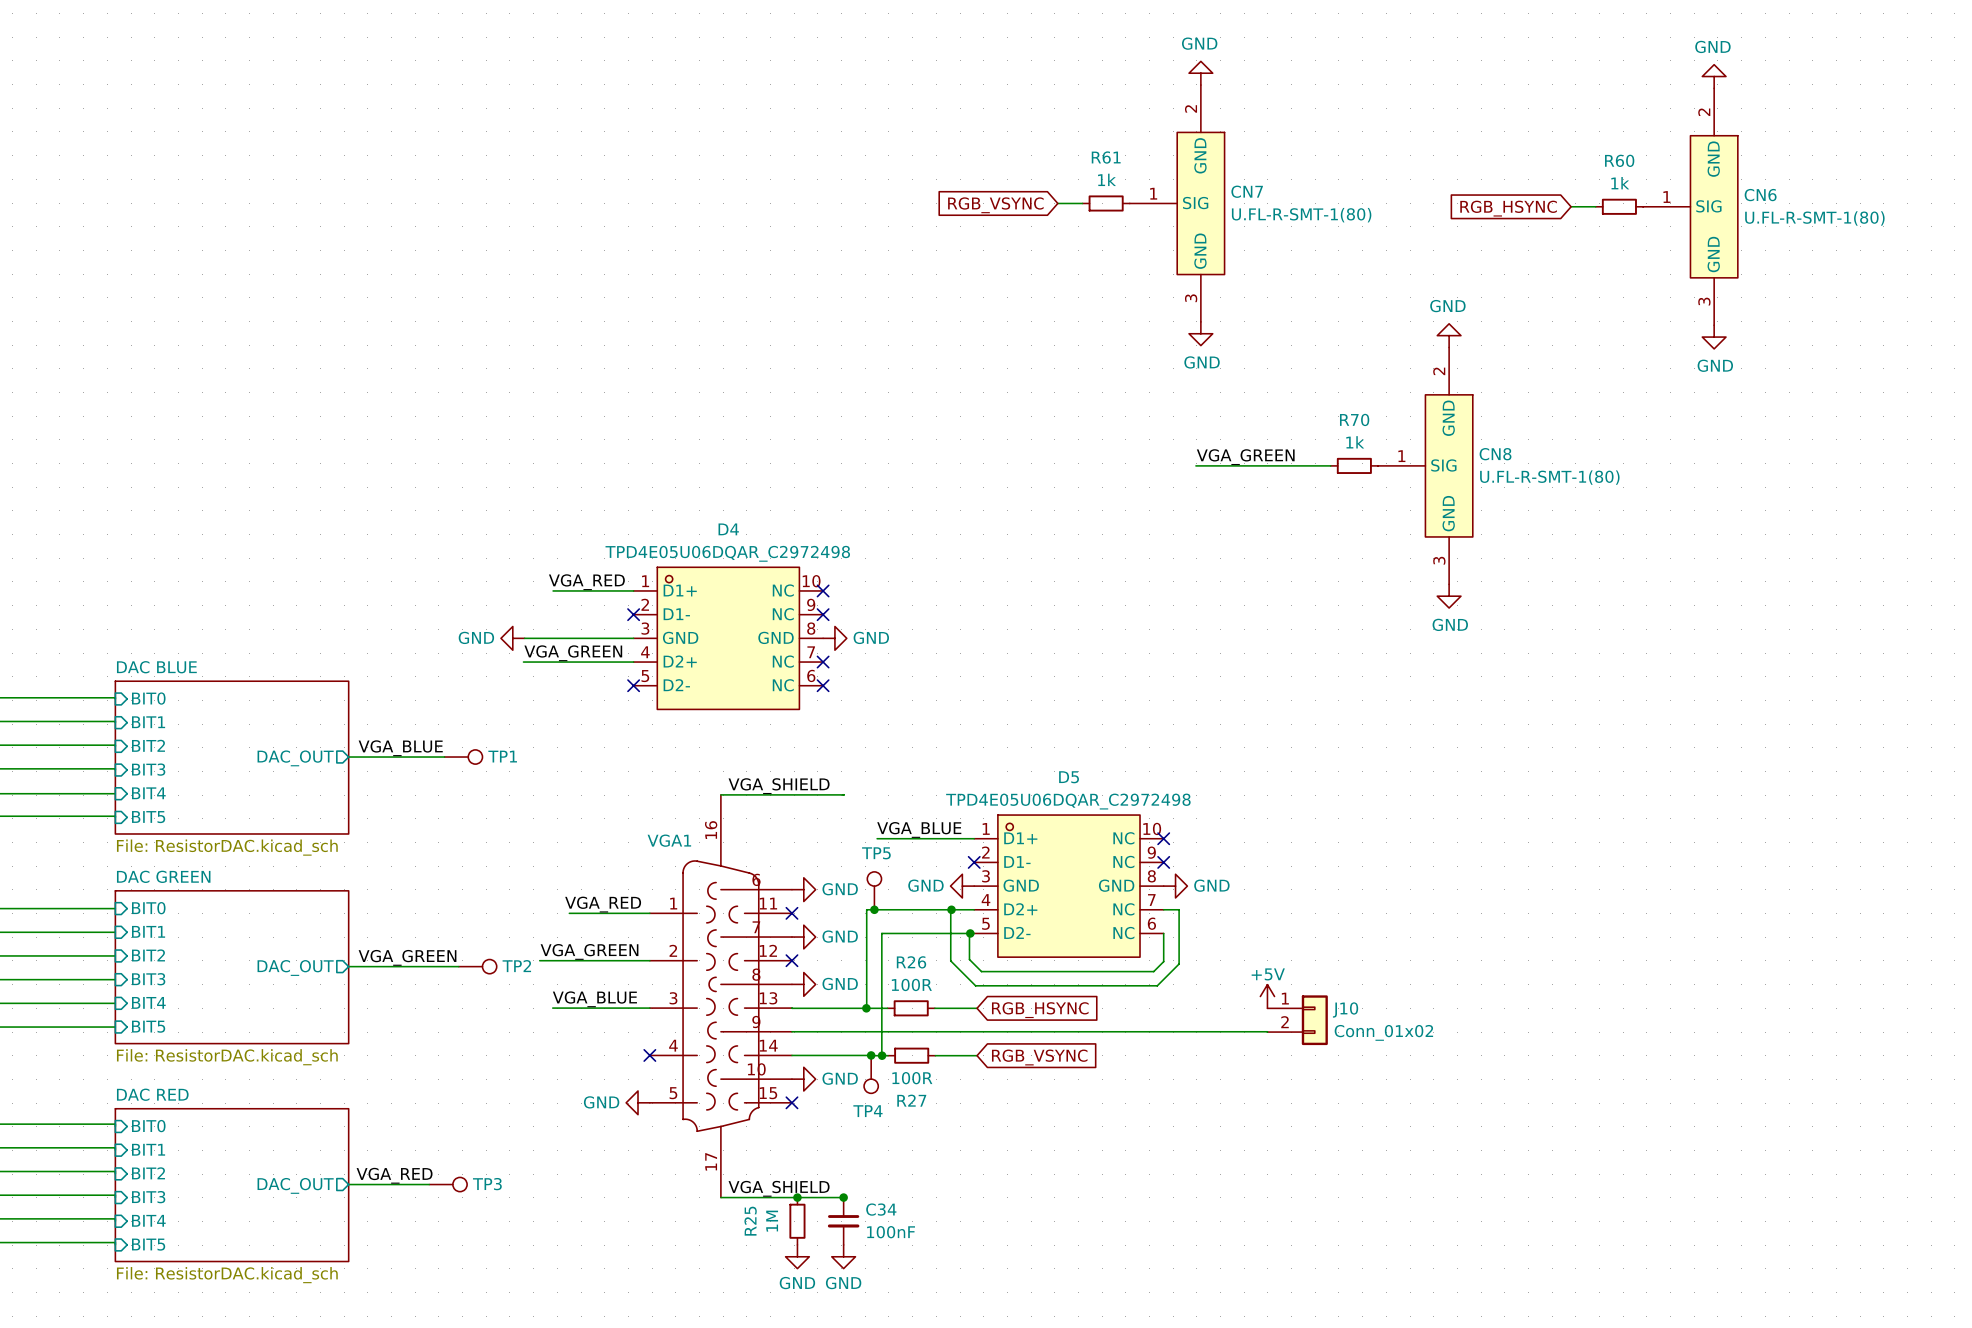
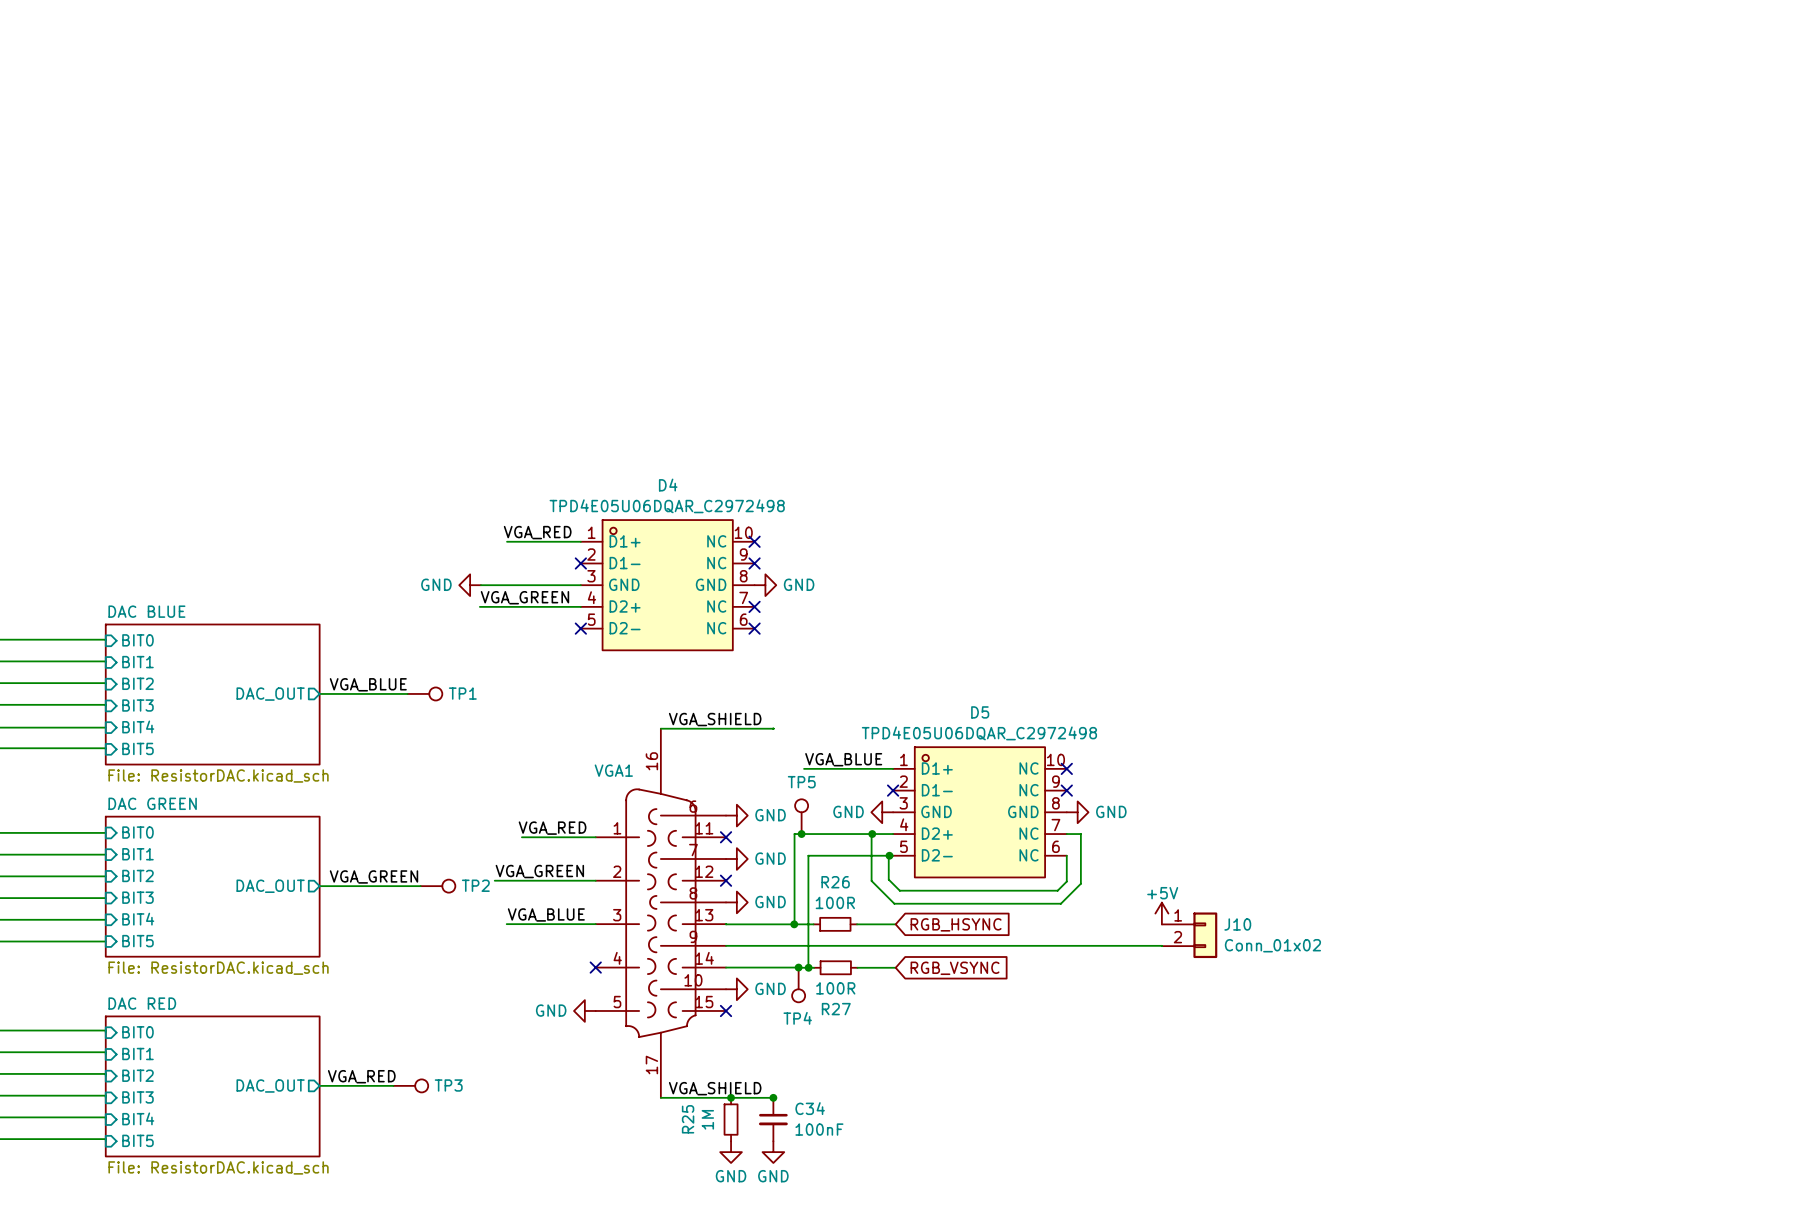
power symbol: GND (1200, 73) -> none
power symbol: GND (1714, 76) -> none
wire: (1057, 203) (1082, 203) -> none
R61: 1k (1106, 203) -> none
CN7: U.FL-R-SMT-1(80) (1177, 203) -> none
global label: RGB_VSYNC (995, 205) -> none
wire: (1571, 206) (1595, 206) -> none
R60: 1k (1619, 206) -> none
CN6: U.FL-R-SMT-1(80) (1690, 206) -> none
global label: RGB_HSYNC (1508, 208) -> none
power symbol: GND (1200, 333) -> none
power symbol: GND (1449, 335) -> none
power symbol: GND (1714, 337) -> none
label: VGA_GREEN (1245, 457) -> none
wire: (1195, 465) (1330, 465) -> none
R70: 1k (1354, 465) -> none
CN8: U.FL-R-SMT-1(80) (1425, 465) -> none
power symbol: GND (1449, 596) -> none

